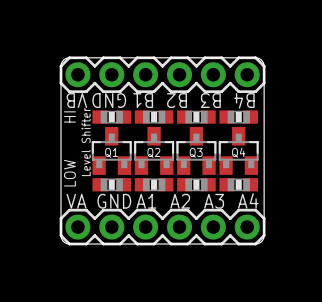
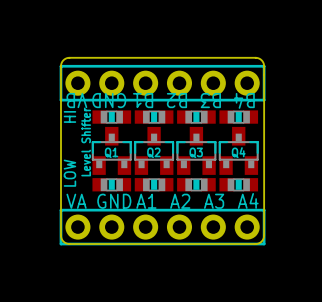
part footprint: [59, 56, 266, 94] -> [59, 64, 266, 102]
part footprint: [59, 208, 266, 246] -> [59, 208, 266, 246]

